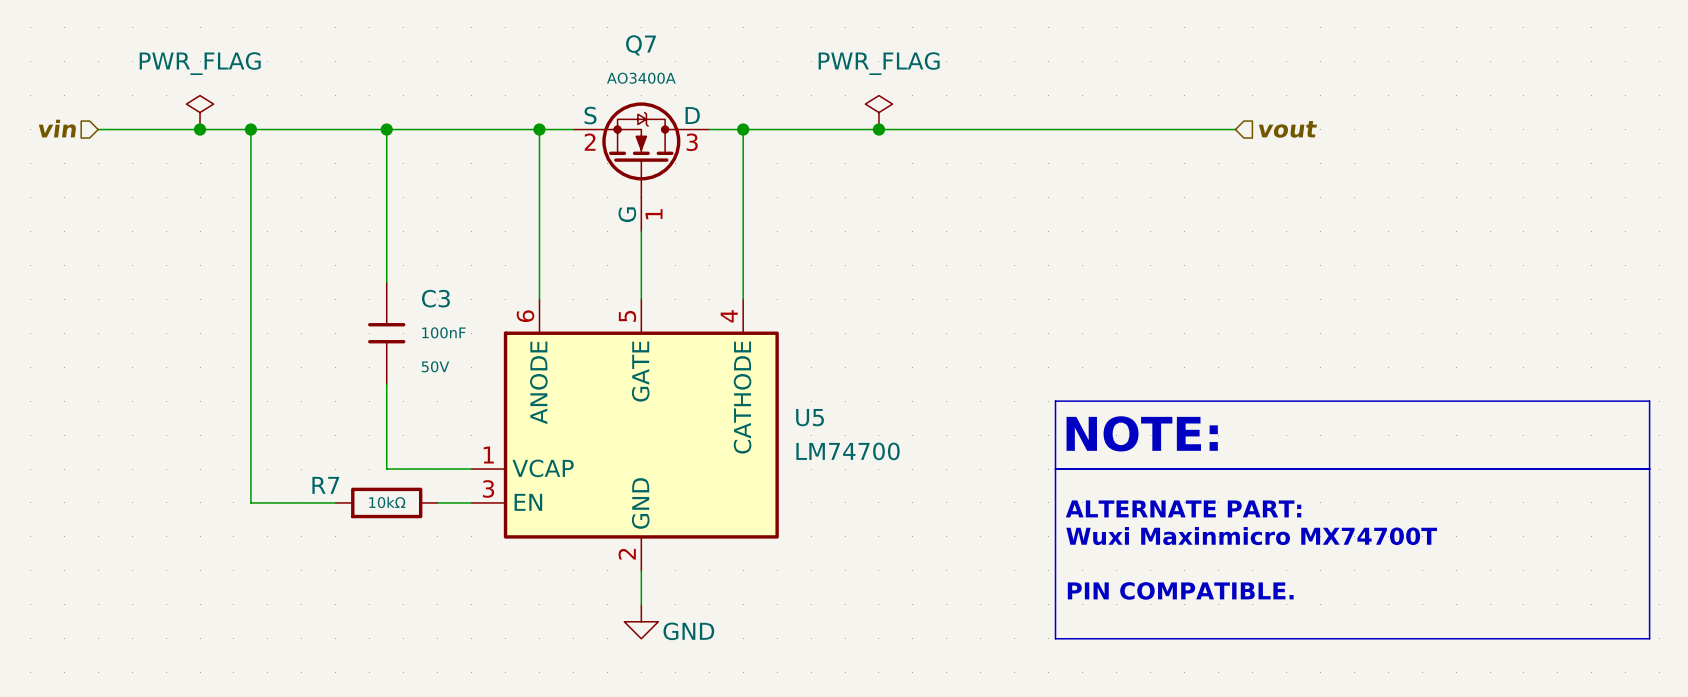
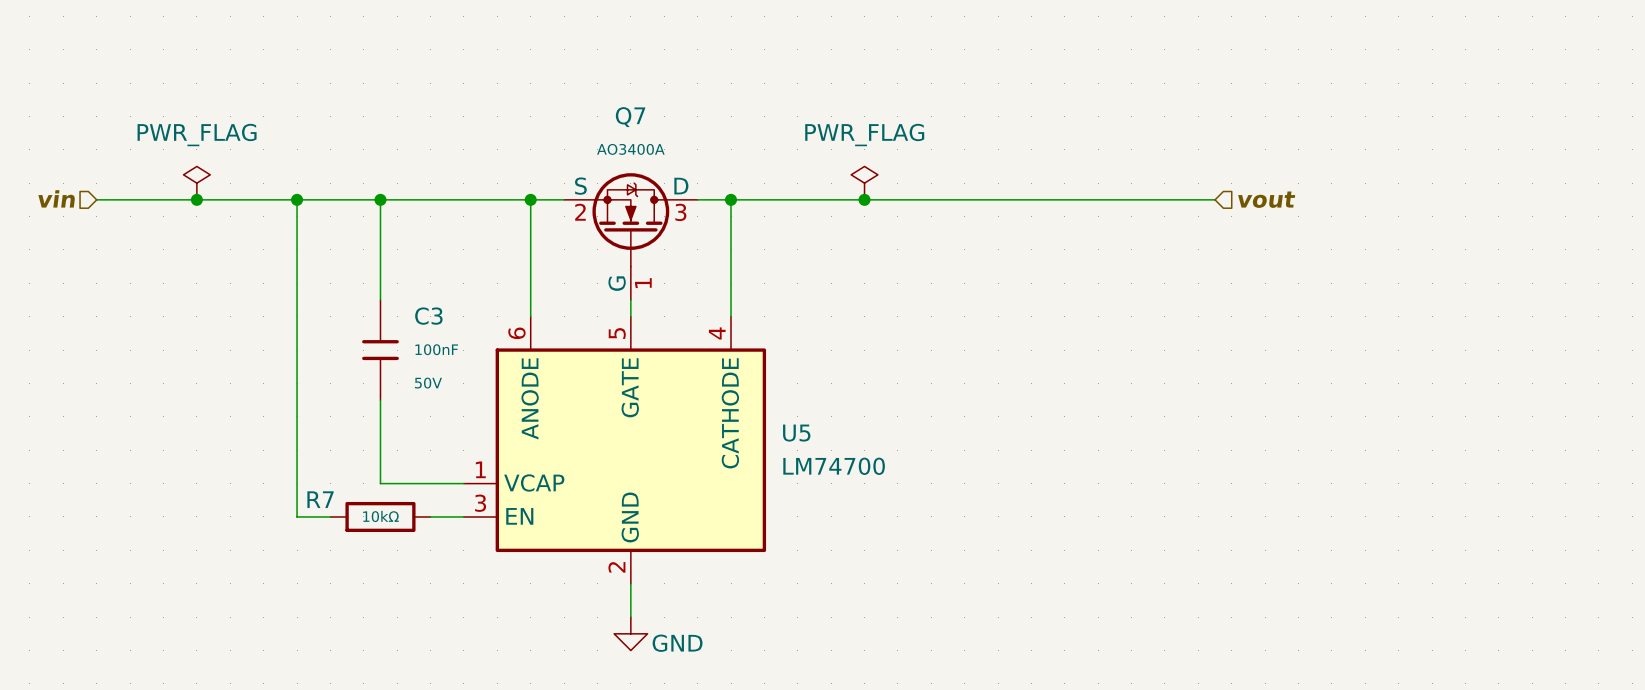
power symbol position: PWR_FLAG (200, 112) -> PWR_FLAG (196, 183)
power symbol position: PWR_FLAG (878, 112) -> PWR_FLAG (864, 183)
hierarchical label position: vin (57, 128) -> vin (56, 198)
wire: (98, 129) (573, 129) -> (96, 199) (564, 199)
junction: (200, 129) -> none
wire: (250, 129) (250, 502) (301, 502) -> (297, 199) (297, 516)
junction: (250, 129) -> none
wire: (386, 129) (386, 180) -> none
junction: (386, 129) -> none
wire: (539, 129) (539, 180) -> none
junction position: (539, 129) -> (530, 199)
wire: (709, 129) (1235, 129) -> (697, 199) (1215, 199)
wire: (743, 129) (743, 180) -> none
junction position: (743, 129) -> (731, 199)
junction position: (878, 129) -> (864, 199)
hierarchical label position: vout (1287, 129) -> vout (1266, 199)
Q7 position: (641, 166) -> (630, 236)
junction: none -> (196, 199)
junction: none -> (297, 199)
junction: none -> (380, 199)
line: (1055, 401) (1649, 401) (1649, 638) (1055, 638) (1055, 401) -> none
text: NOTE: (1142, 433) -> none
line: (1055, 469) (1649, 469) -> none
text: ALTERNATE PART: (1183, 508) -> none
text: Wuxi Maxinmicro MX74700T (1251, 536) -> none
text: PIN COMPATIBLE. (1180, 590) -> none

